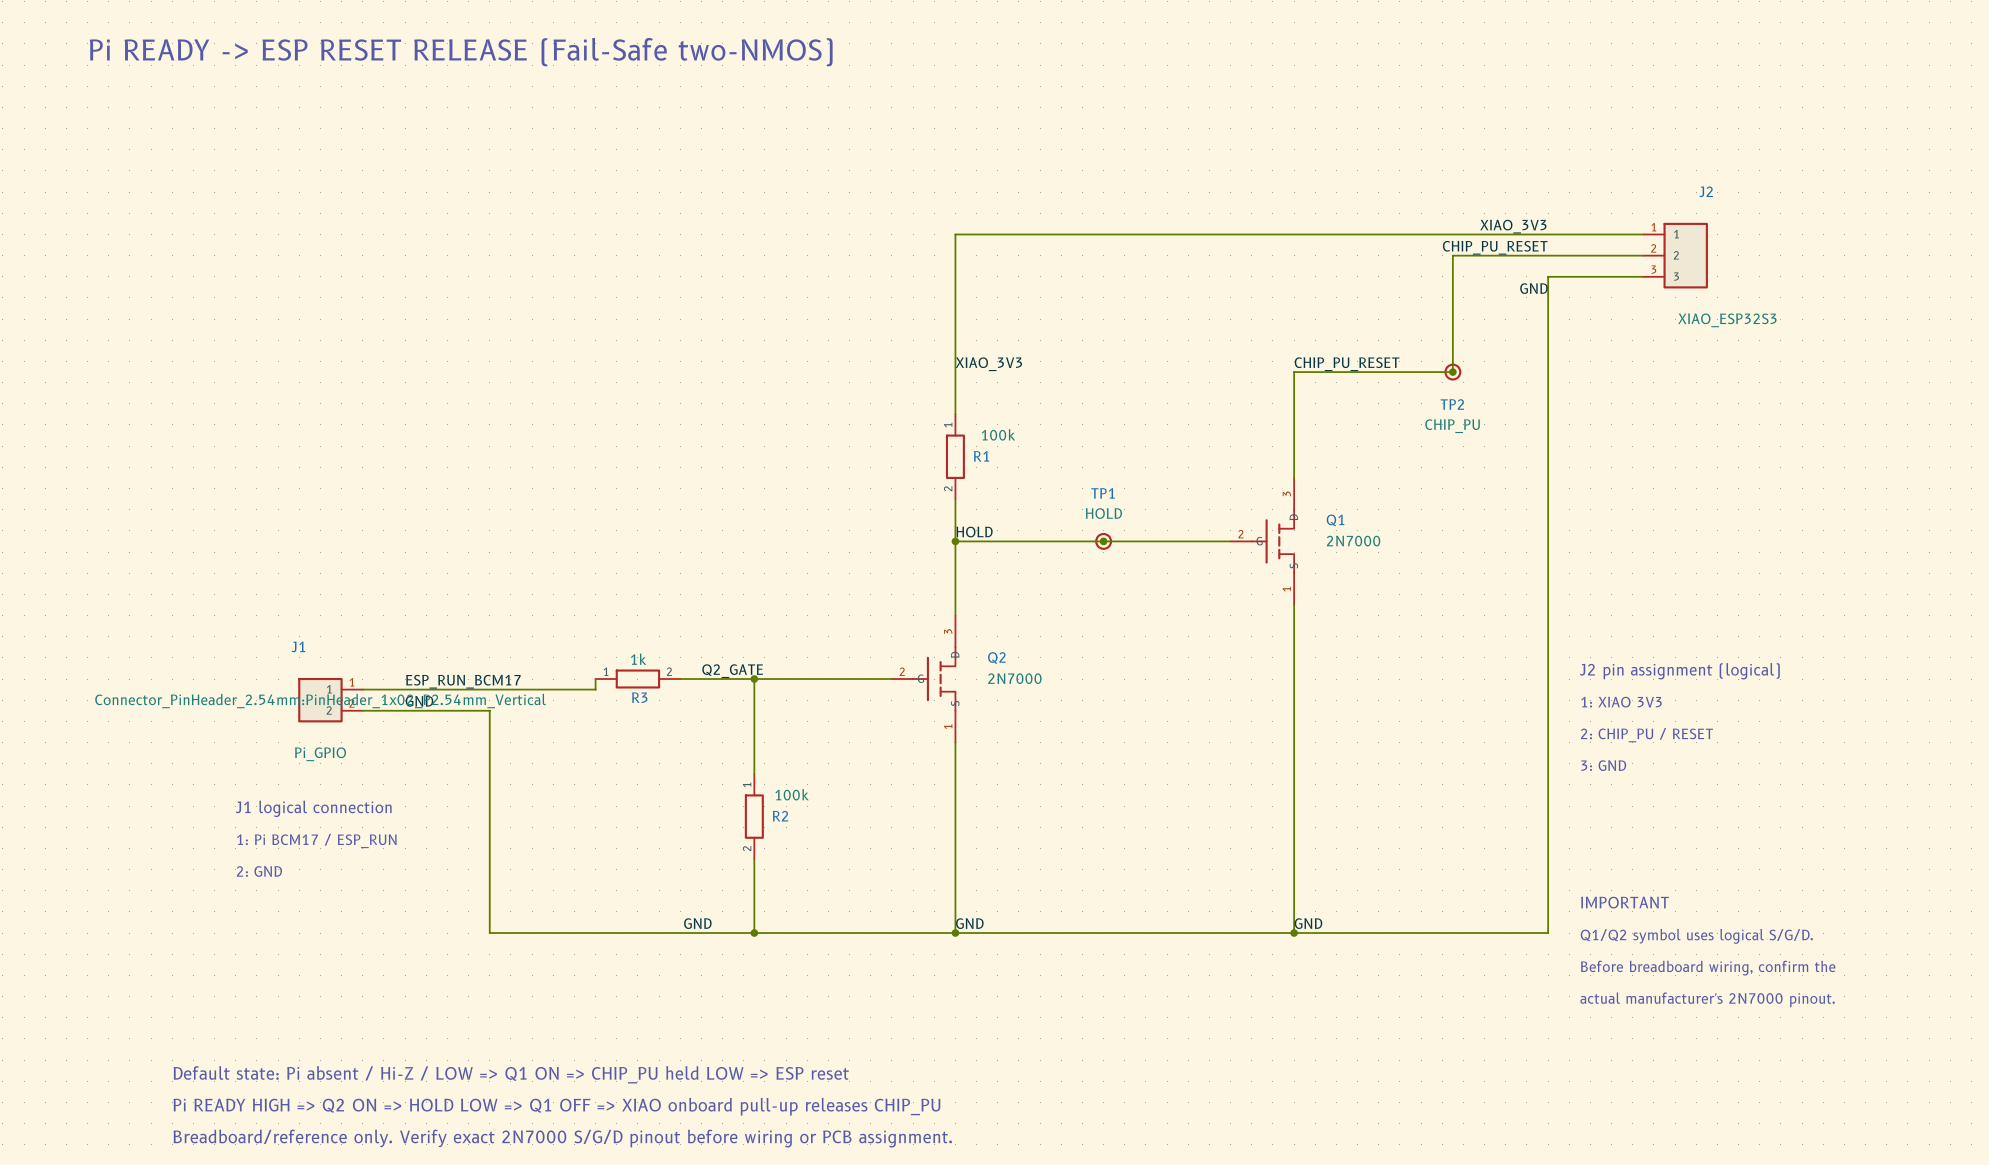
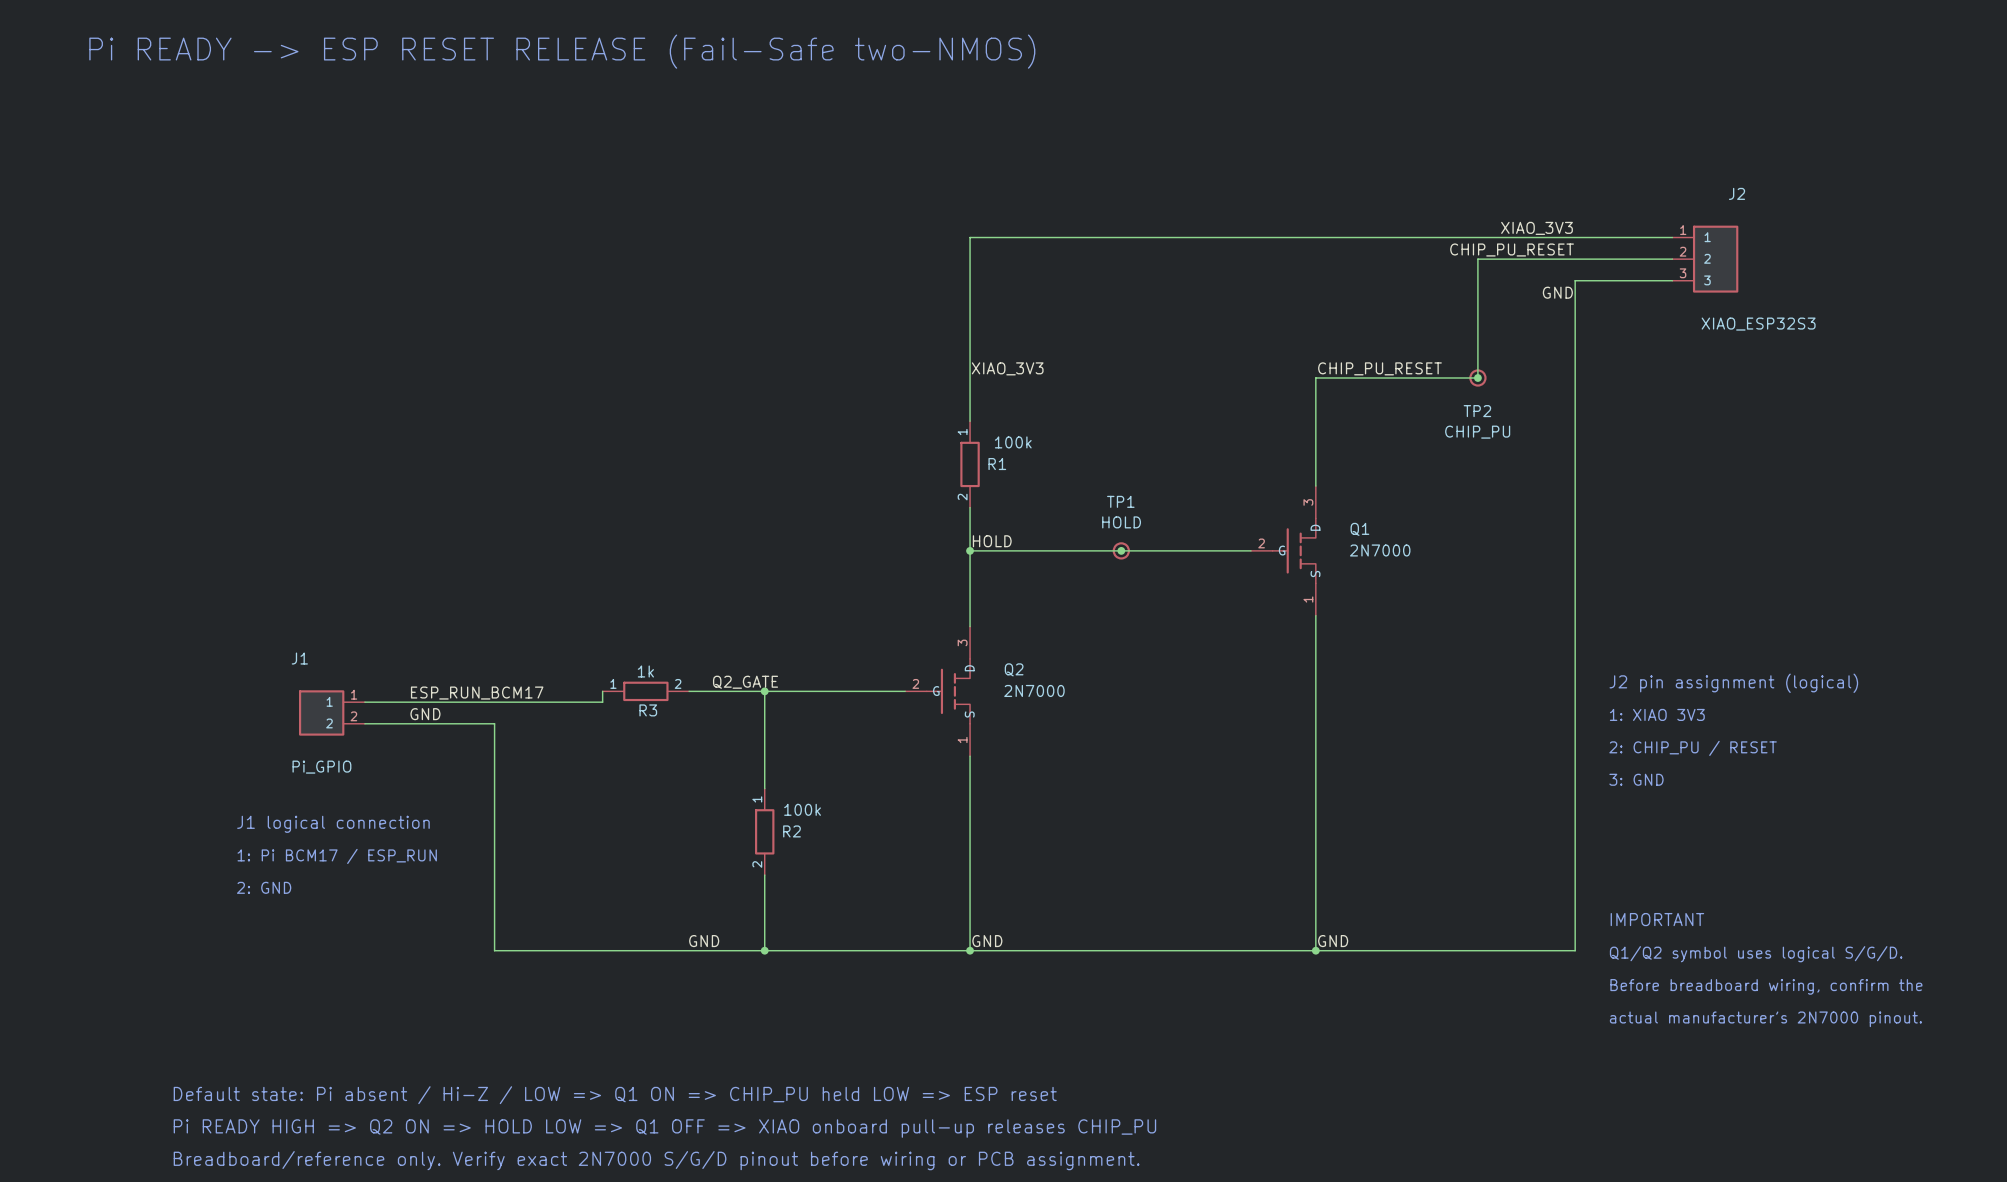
J1 text: Connector_PinHeader_2.54mm:PinHeader_1x02_P2.54mm_Vertical (320, 701) -> none

